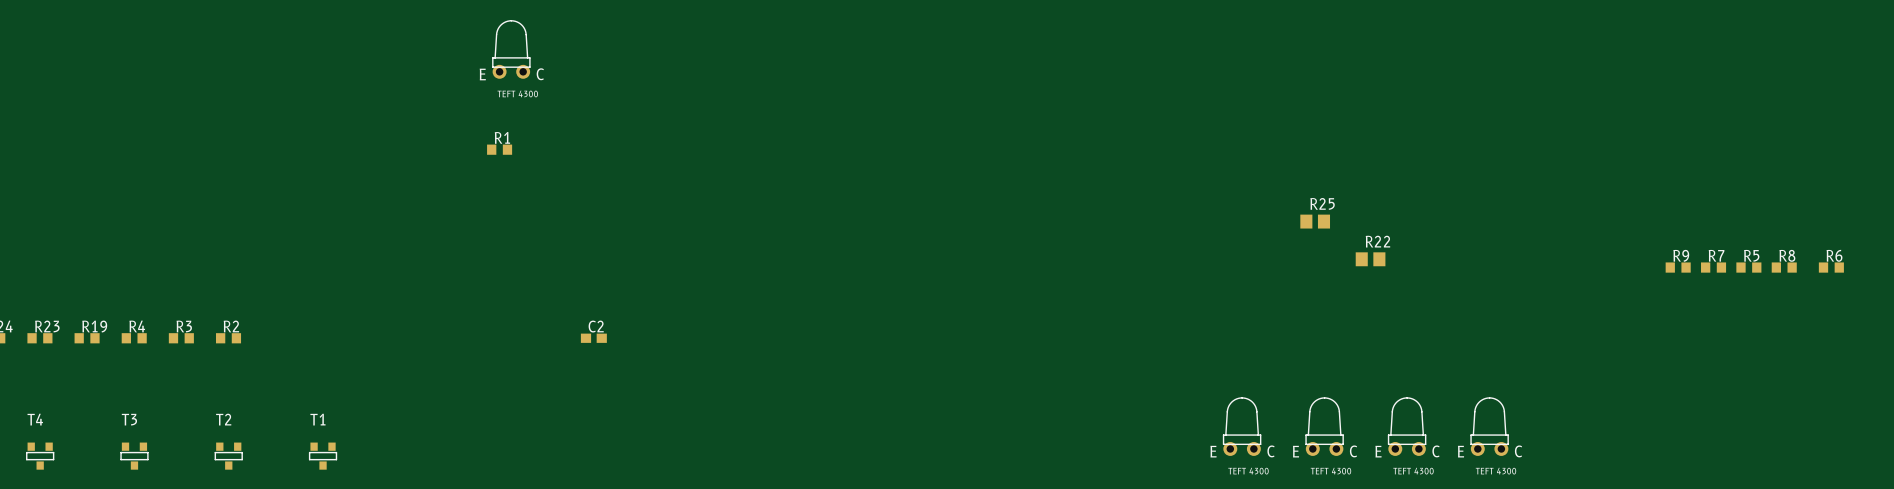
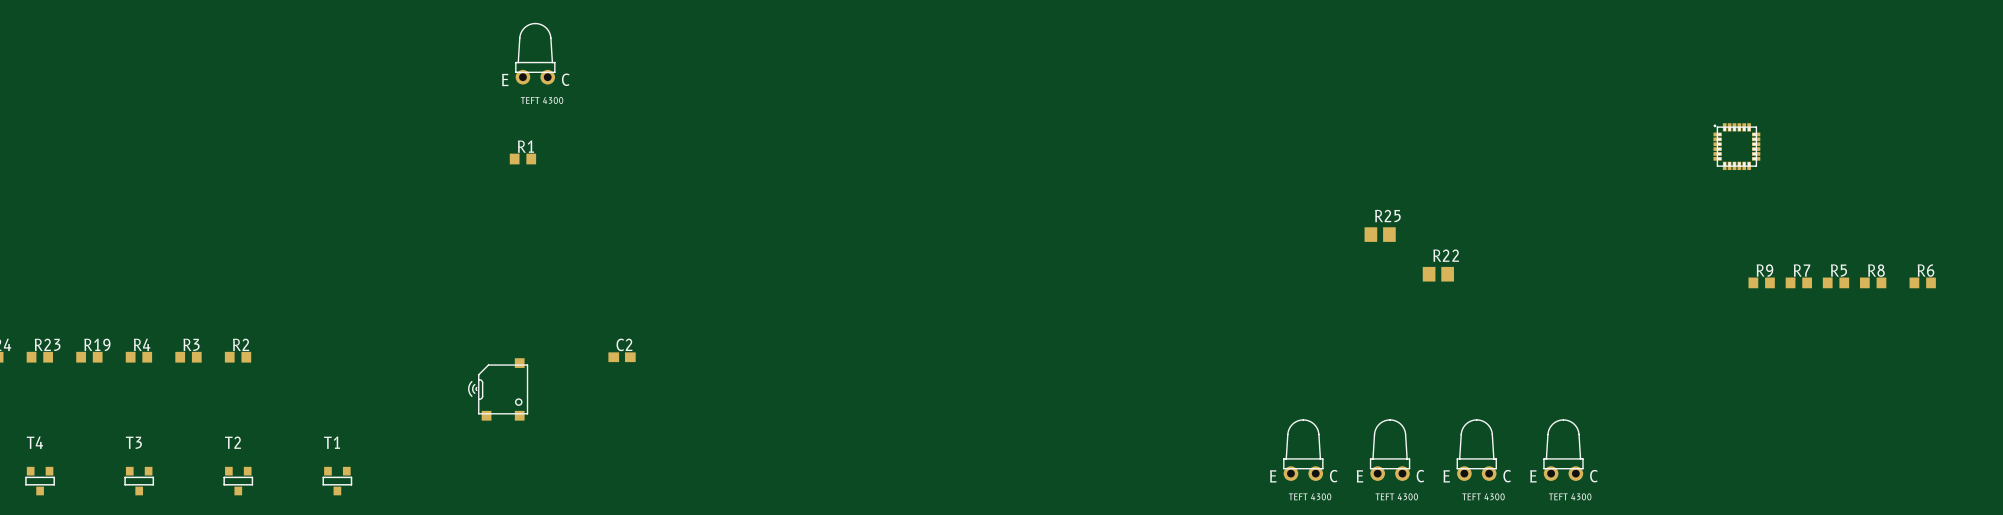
part: none -> (1736, 146)
part: none -> (498, 389)

